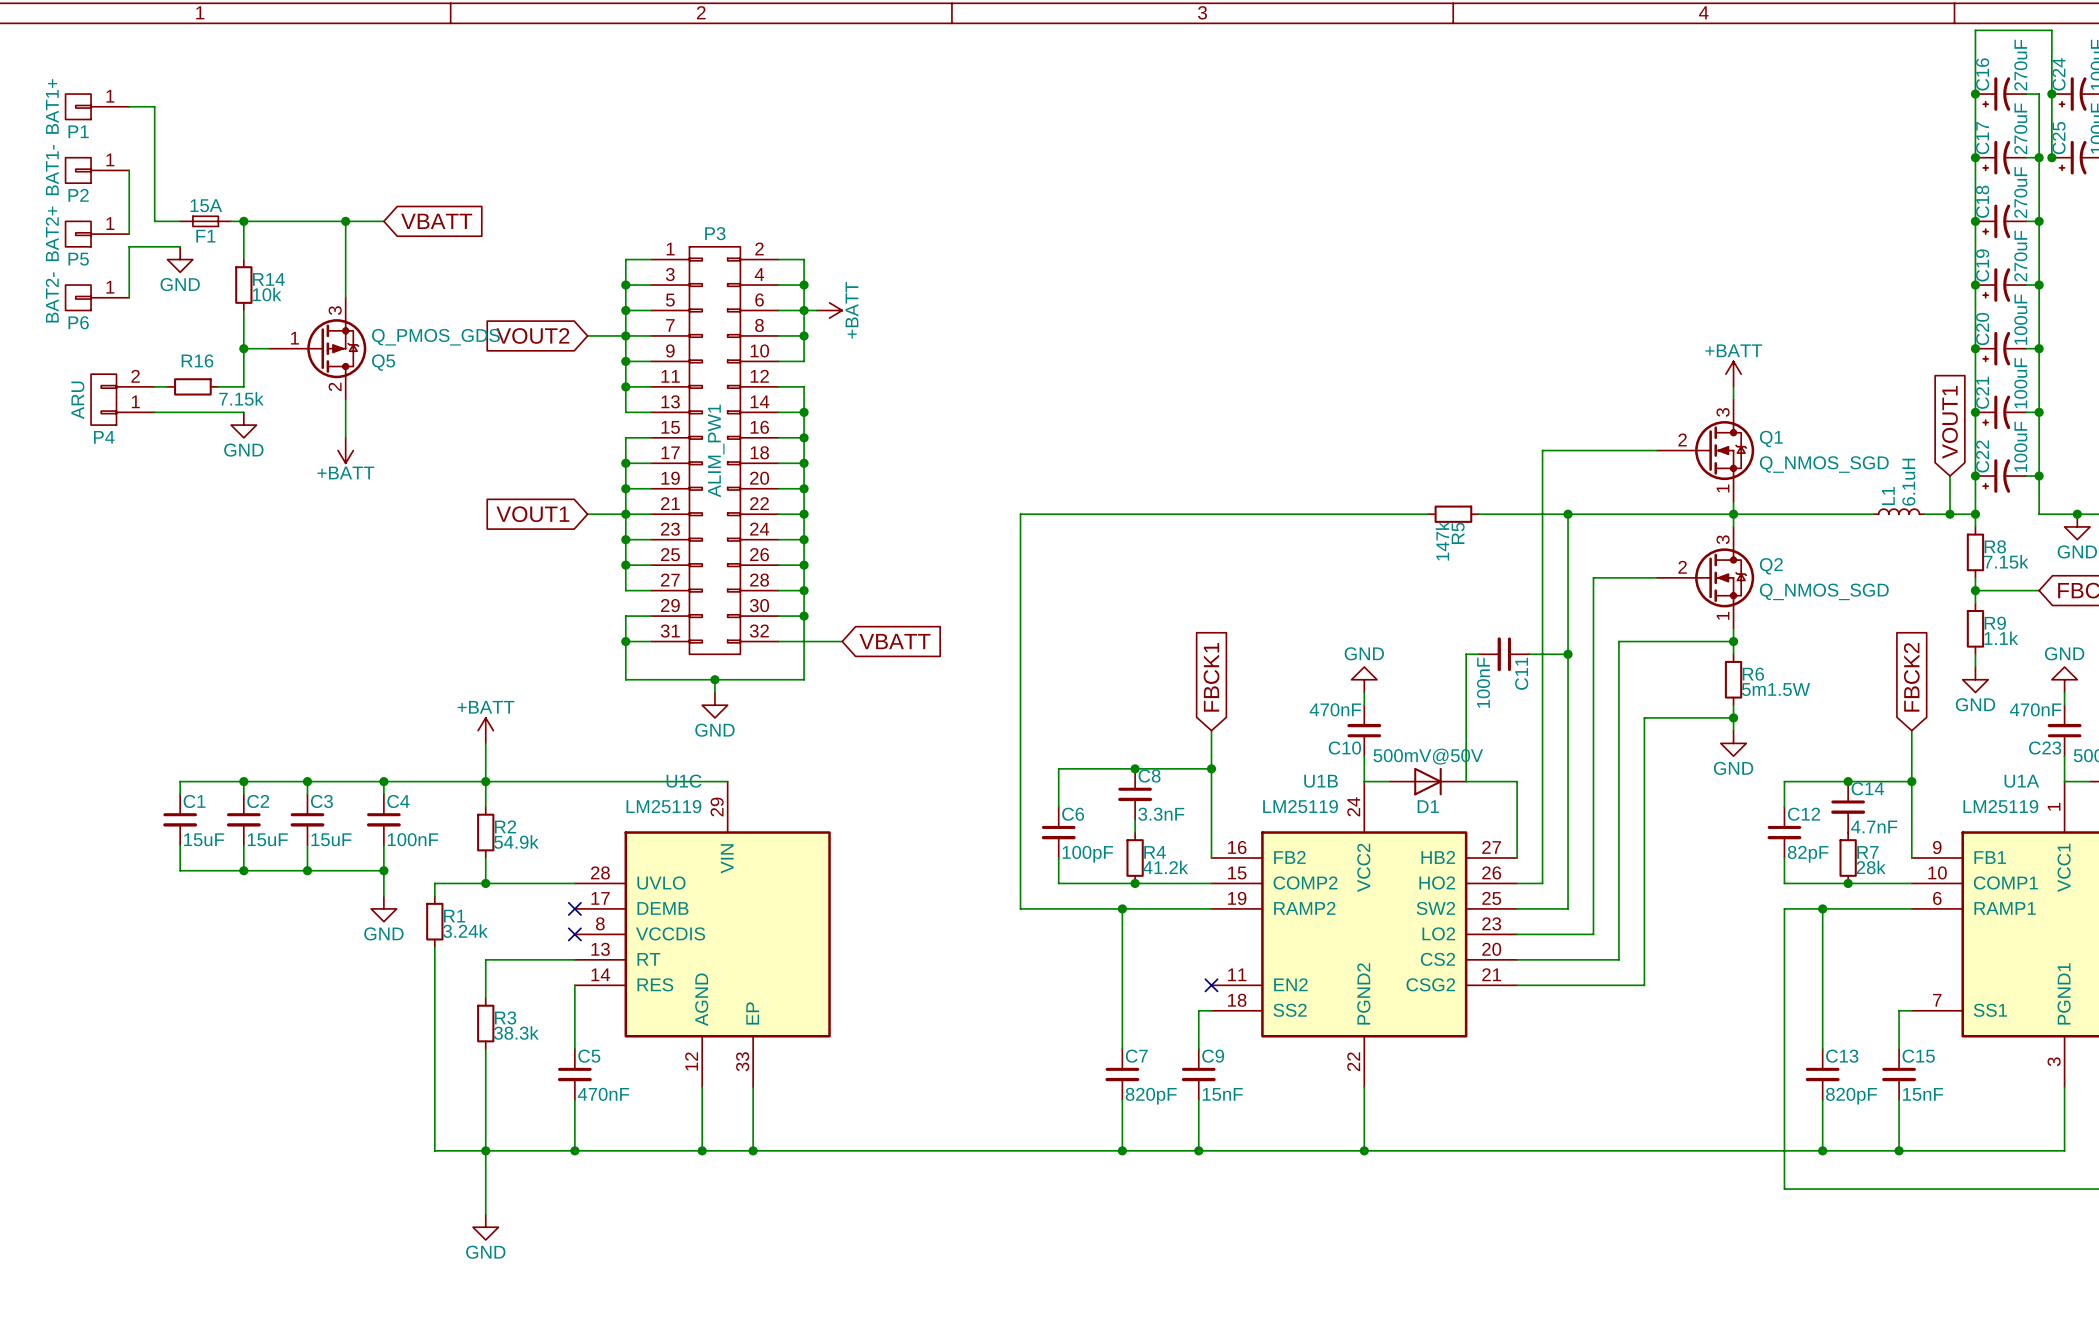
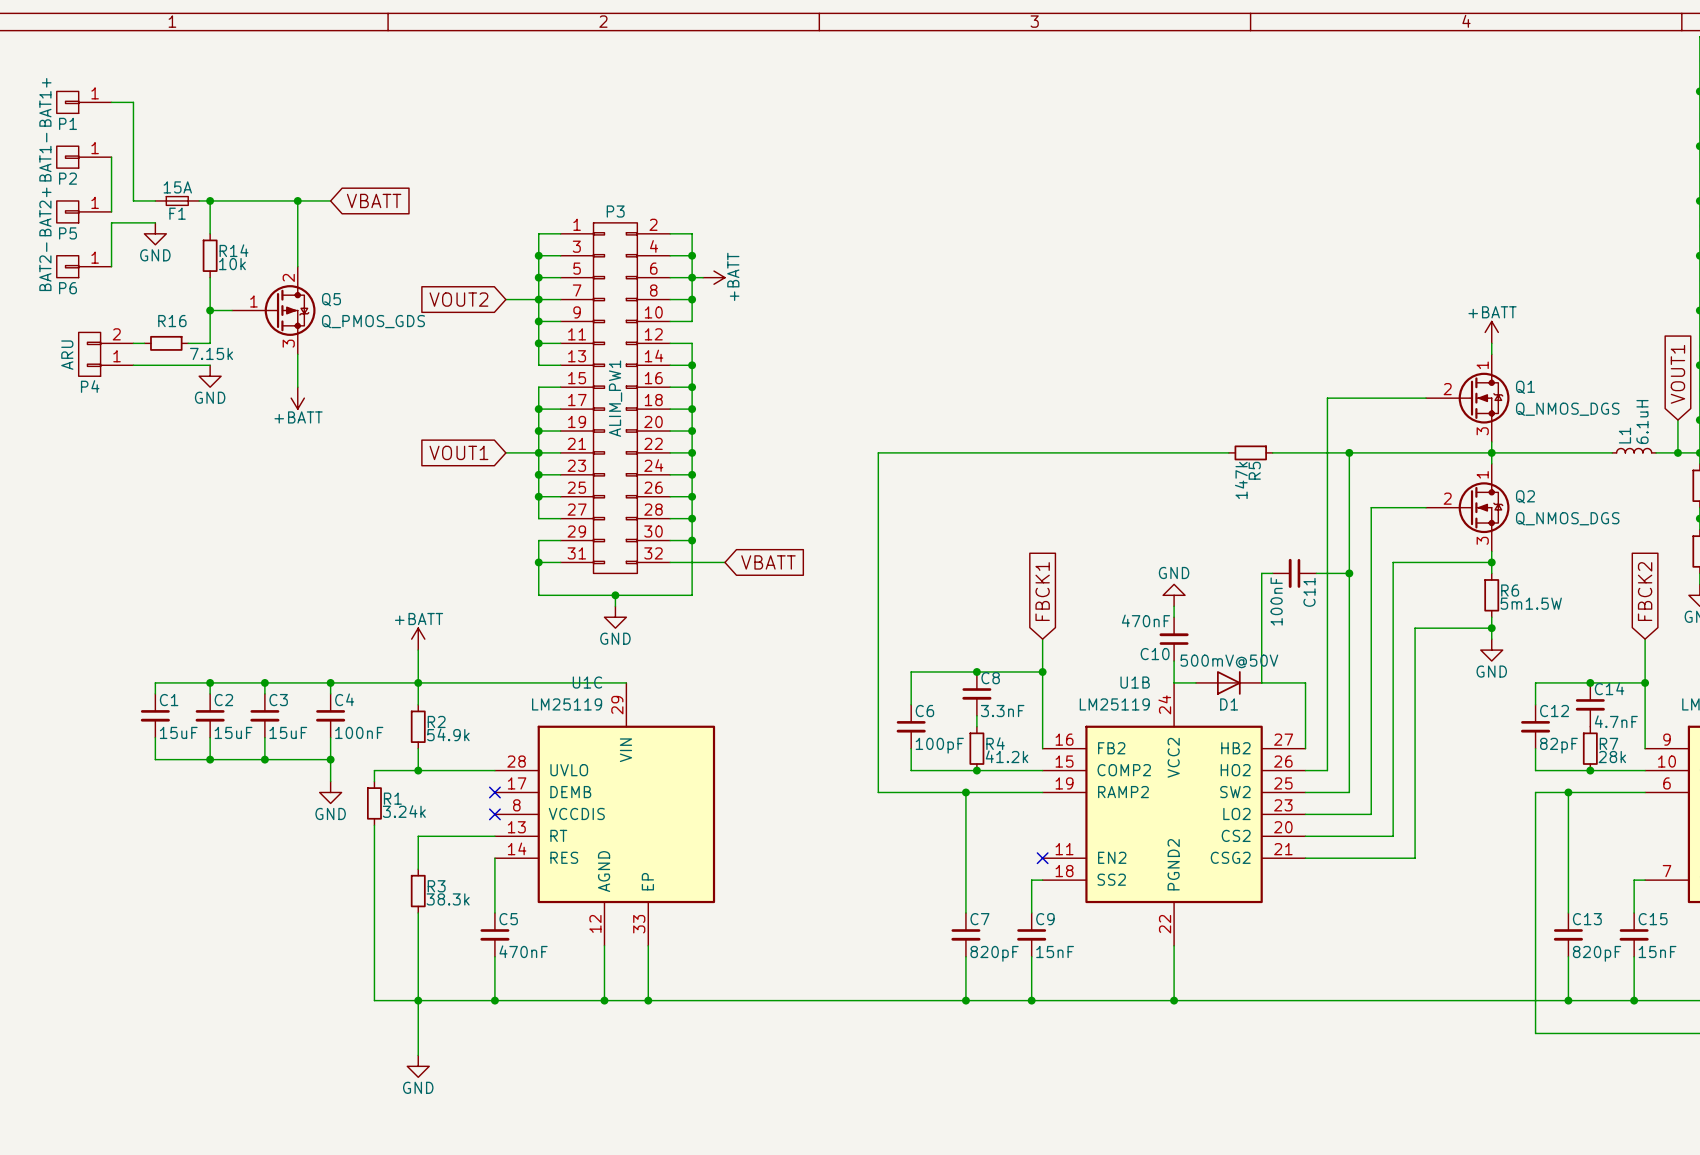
Q5 flip: as is (336, 348) -> up-down (290, 310)
Q1 pin number: 3 (1723, 412) -> 1 (1482, 365)
Q1 value: Q_NMOS_SGD (1824, 464) -> Q_NMOS_DGS (1567, 409)
Q1 pin number: 1 (1723, 488) -> 3 (1482, 431)
Q2 pin number: 3 (1723, 539) -> 1 (1482, 474)
Q2 value: Q_NMOS_SGD (1824, 591) -> Q_NMOS_DGS (1567, 518)
Q2 pin number: 1 (1723, 615) -> 3 (1482, 540)

